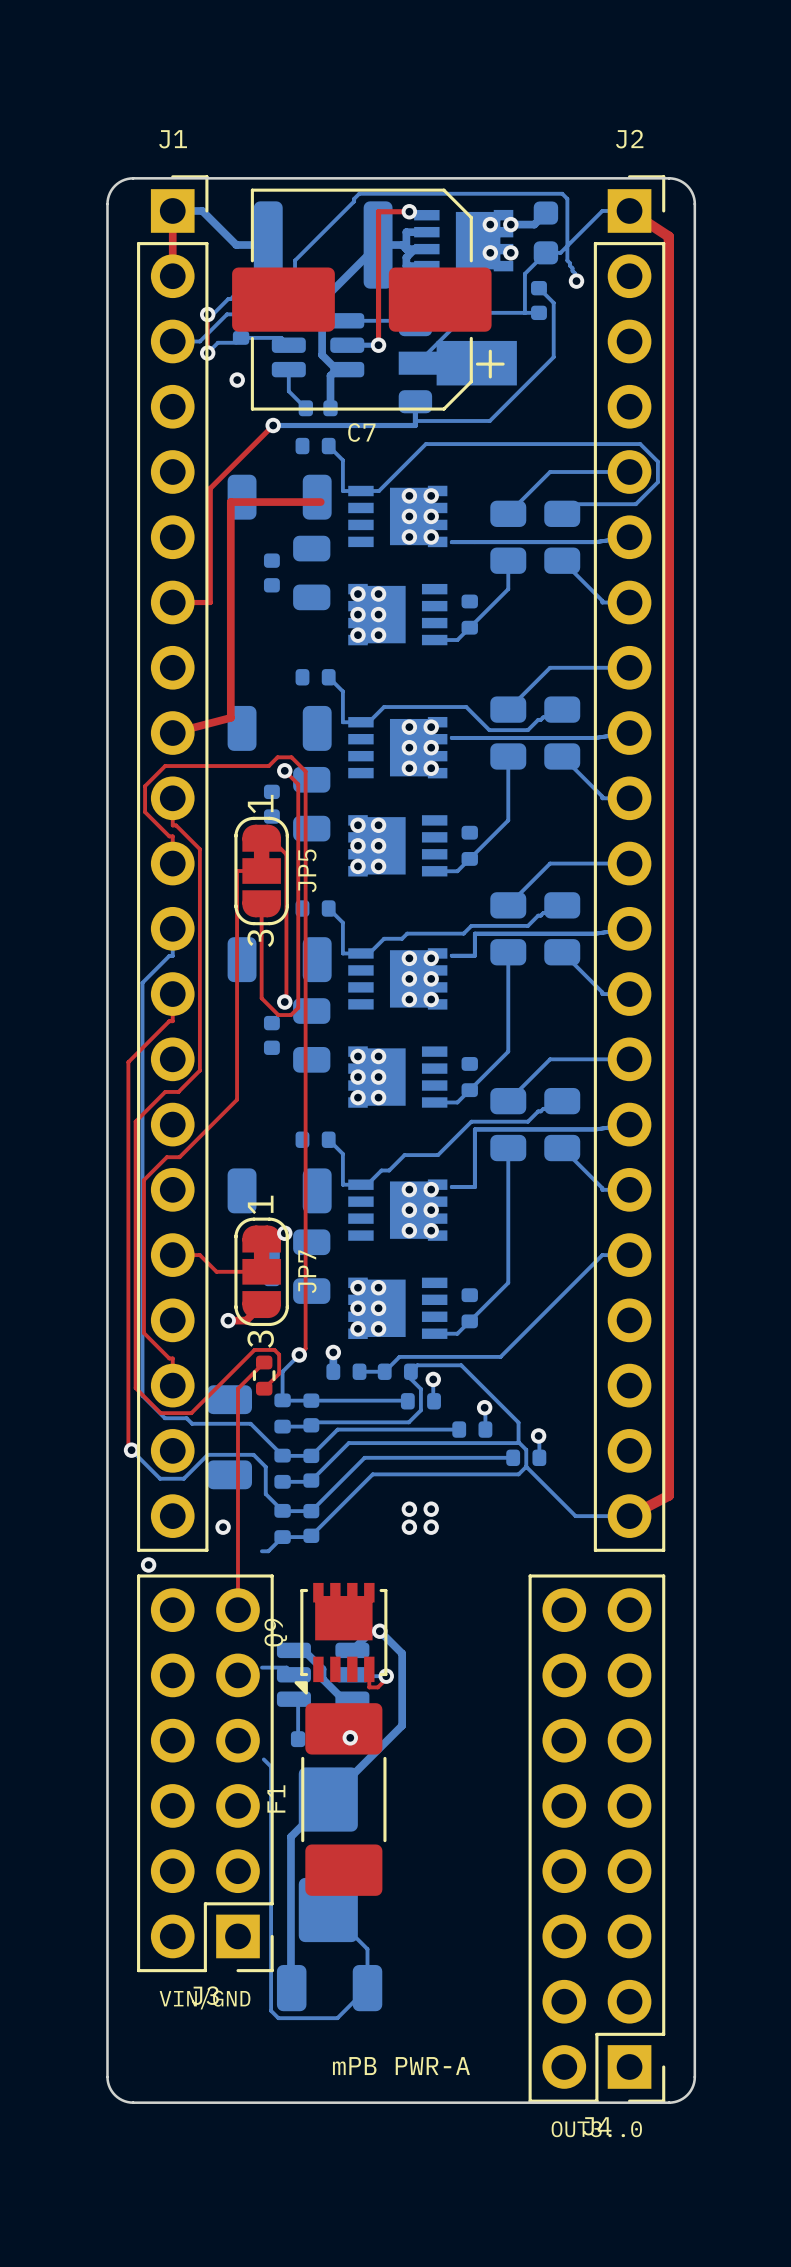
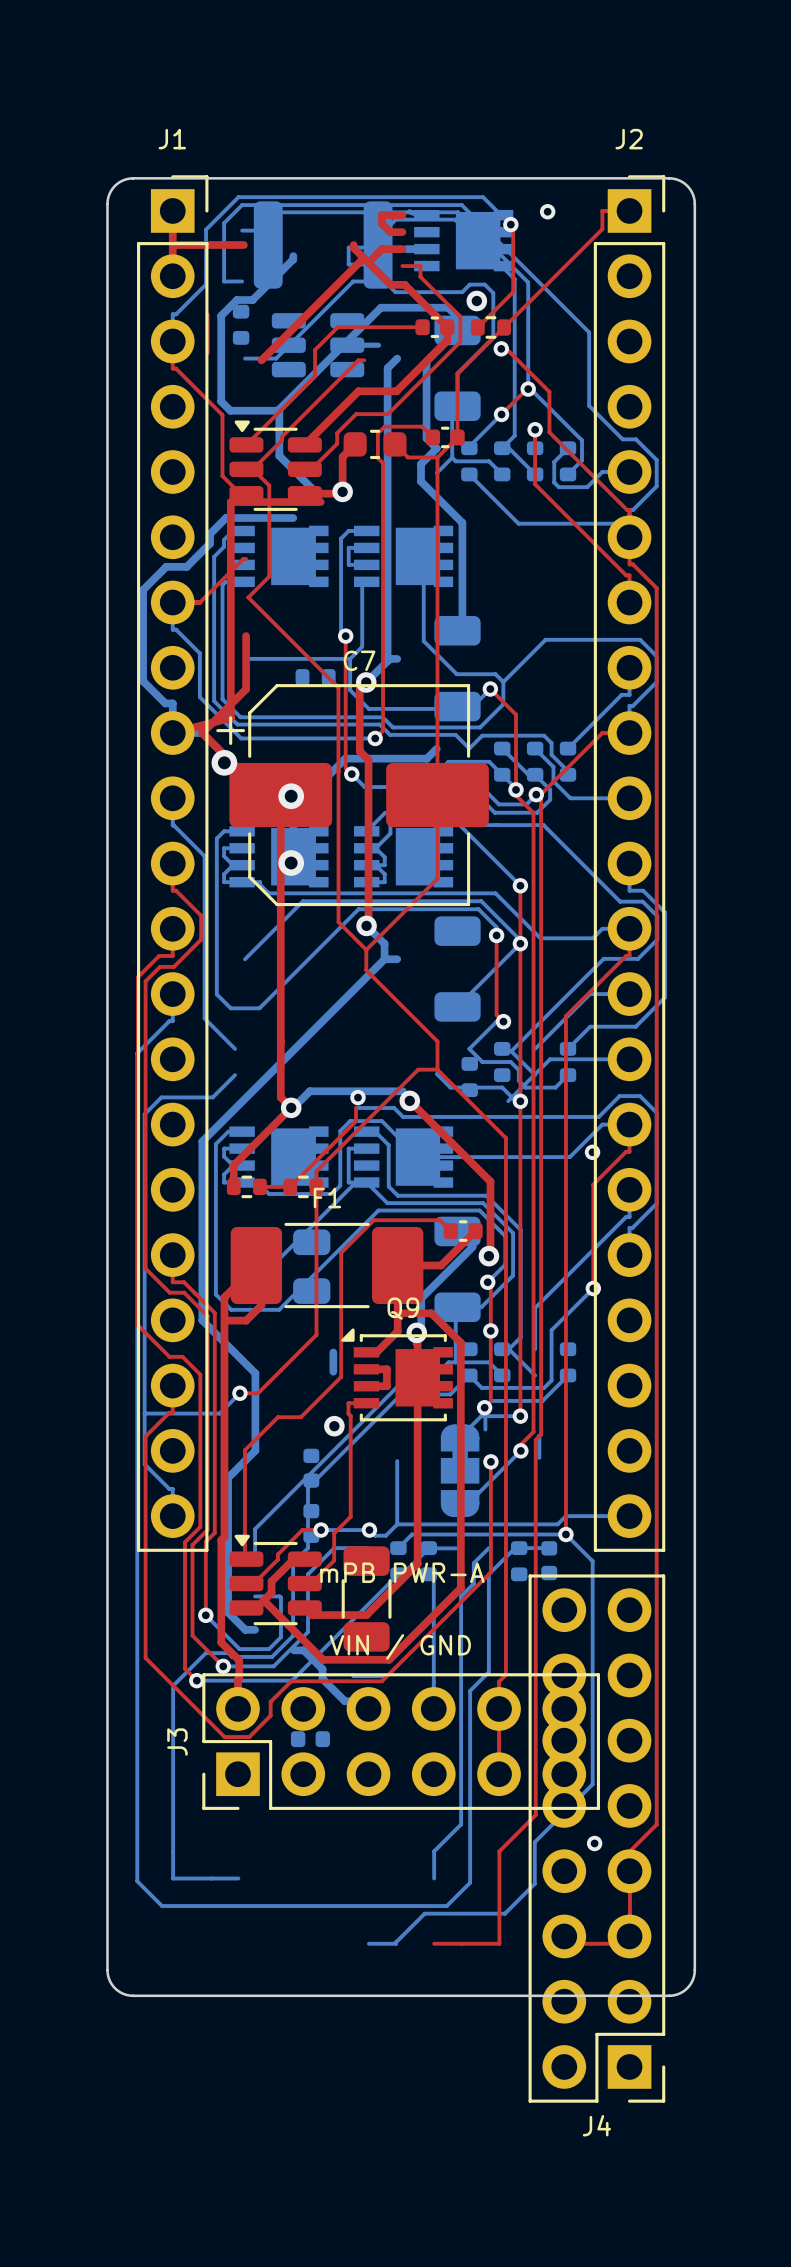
bottom track: (172, 210) (202, 210) (236, 245) (268, 245) -> none
top track: (629, 210) (668, 236) (668, 1495) (629, 1516) -> (629, 210) (602, 210) (602, 229) (457, 373) (457, 437) (437, 457)
bottom track: (629, 210) (602, 210) (560, 252) (545, 252) (524, 273) (524, 312) -> none
top track: (409, 211) (378, 211) (378, 345) -> none
via: (409, 211) -> none
via: none -> (547, 211)
bottom track: (545, 213) (534, 224) (510, 224) -> none
top track: none -> (402, 215) (381, 215) (381, 223) (390, 232) (402, 232)
via: (490, 224) -> none
top track: none -> (513, 227) (513, 292) (477, 327)
bottom track: none -> (242, 230) (260, 230) (260, 227) (275, 212) (458, 212) (528, 282) (528, 389) (530, 389) (582, 440) (582, 460) (568, 474)
bottom track: none -> (366, 230) (384, 230) (395, 219) (455, 219) (514, 279) (514, 435) (502, 448)
bottom track: (426, 232) (406, 232) (406, 249) (402, 245) (378, 245) (322, 300) (322, 355) (336, 369) -> none
part: (545, 232) -> none
top track: none -> (172, 245) (243, 245)
top track: none -> (353, 245) (353, 247) (390, 284) (404, 284) (447, 327) (447, 340) (396, 391) (358, 391) (304, 444)
bottom track: none -> (366, 247) (348, 247) (348, 264) (366, 264)
top track: none -> (402, 249) (381, 249) (368, 262)
bottom track: (414, 249) (406, 257) (406, 266) (426, 266) -> none
via: (490, 252) -> none
via: (510, 252) -> none
bottom track: none -> (293, 256) (293, 259) (252, 300) (236, 300) (221, 315) (221, 401) (230, 410) (279, 410)
top track: none -> (363, 258) (261, 360)
top track: none -> (402, 266) (420, 266) (420, 276) (460, 316) (460, 341) (388, 414) (356, 414) (337, 433) (337, 443) (311, 469) (304, 469)
via: (576, 281) -> none
bottom track: (577, 281) (567, 260) (567, 198) (562, 193) (359, 193) (354, 201) (295, 260) (295, 288) (287, 296) (233, 296) (212, 314) (207, 314) -> none
bottom track: (538, 288) (553, 302) (553, 357) (489, 420) (415, 420) -> none
C7 rotation: 0° (368, 299) -> 180° (352, 795)
C7 position: (368, 299) -> (352, 795)
part: (538, 300) -> none
via: none -> (476, 301)
bottom track: (538, 312) (468, 312) (417, 363) -> none
part footprint: [398, 313, 517, 414] -> [434, 315, 481, 422]
via: (207, 314) -> none
bottom track: (241, 314) (227, 314) (199, 341) (172, 341) -> (513, 227) (483, 197) (238, 197) (206, 229) (206, 284) (176, 314) (172, 314) (172, 341)
bottom track: (362, 320) (401, 320) -> none
top track: none -> (422, 327) (337, 327) (315, 349) (315, 376) (246, 444)
part: none -> (434, 327)
part: none -> (490, 327)
bottom track: (241, 337) (281, 337) (288, 345) -> none
top track: none -> (172, 341) (172, 368) (176, 368) (222, 415) (222, 476) (240, 493) (246, 493)
bottom track: (235, 342) (217, 342) (207, 353) -> none
via: (378, 345) -> none
top track: none -> (501, 348) (506, 348) (549, 391) (549, 432) (627, 510) (629, 510) (629, 564) (632, 564) (656, 588) (656, 1824) (629, 1851) (629, 1943) (564, 1943)
via: none -> (501, 348)
via: (207, 353) -> none
bottom track: none -> (245, 358) (276, 358) (353, 281) (384, 281) (395, 292) (462, 292) (469, 284) (484, 284) (493, 293) (493, 337) (457, 373) (457, 406) (452, 411) (452, 457)
bottom track: none -> (397, 358) (387, 368) (387, 661) (366, 682)
top track: none -> (364, 360) (358, 360) (282, 436) (282, 440) (252, 469)
bottom track: (288, 369) (288, 391) (305, 408) -> none
bottom track: (336, 369) (330, 375) (330, 408) -> none
via: (237, 380) -> none
top track: none -> (528, 389) (501, 414)
via: none -> (528, 389)
bottom track: (415, 401) (415, 425) (273, 425) -> none
part: (318, 408) -> none
bottom track: none -> (501, 414) (469, 448)
via: none -> (501, 414)
top track: (273, 425) (210, 488) (210, 602) (199, 602) -> (246, 558) (243, 558) (199, 602)
via: (273, 425) -> none
top track: none -> (535, 429) (535, 484) (626, 575) (629, 575) (629, 602)
via: none -> (535, 429)
top track: none -> (432, 437) (422, 426) (384, 426) (377, 433) (377, 458) (383, 463) (383, 730) (375, 738)
part: none -> (445, 437)
top track: none -> (355, 444) (342, 456) (342, 491) (340, 493) (304, 493)
part: none -> (375, 444)
top track: none -> (394, 444) (408, 457) (437, 457)
bottom track: none -> (505, 444) (535, 474)
part: (315, 446) -> none
bottom track: (328, 446) (342, 460) (342, 491) (378, 491) (425, 444) (640, 444) (657, 461) (657, 482) (635, 504) (571, 504) (562, 513) -> none
top track: none -> (437, 457) (437, 878) (366, 949)
bottom track: none -> (452, 457) (455, 461) (489, 461) (502, 474)
bottom track: none -> (452, 457) (436, 473)
part: none -> (469, 461)
part: none -> (502, 461)
part: none -> (535, 461)
part: none -> (568, 461)
part: none -> (275, 465)
top track: none -> (252, 469) (269, 485) (269, 576) (248, 597) (338, 687) (338, 922) (366, 949)
bottom track: (602, 472) (550, 472) (508, 513) -> (602, 472) (587, 487) (558, 487) (554, 482) (554, 462) (568, 448)
bottom track: none -> (469, 474) (518, 523) (629, 523)
bottom track: none -> (315, 491) (279, 455) (279, 409) (380, 307) (448, 307) (457, 317) (457, 330) (426, 361) (426, 438) (436, 448) (421, 464) (421, 481) (462, 522) (462, 625) (457, 630)
via: none -> (342, 491)
via: (409, 495) -> none
via: (431, 495) -> none
part: (279, 497) -> none
part: (397, 516) -> none
via: (409, 516) -> none
via: (431, 516) -> none
bottom track: none -> (293, 518) (226, 518) (210, 534) (210, 543) (186, 566) (166, 566) (143, 590) (143, 681) (165, 703) (172, 703) (172, 733) (202, 733) (280, 810) (293, 810)
bottom track: none -> (242, 530) (232, 530) (224, 539) (224, 546) (214, 556) (214, 701) (237, 724) (379, 724) (390, 734) (455, 734) (469, 748) (482, 735) (544, 735) (551, 743) (551, 754) (568, 771) (568, 774)
bottom track: none -> (366, 530) (348, 530) (341, 538) (341, 631) (345, 636)
via: (409, 537) -> none
via: (431, 537) -> none
part: (508, 537) -> none
part: (562, 537) -> none
bottom track: (629, 537) (595, 542) (451, 542) -> (629, 537) (629, 510) (632, 510) (656, 486) (656, 460) (636, 439) (622, 439) (589, 405) (589, 332) (461, 205) (242, 205) (224, 223) (224, 281) (242, 281)
bottom track: none -> (366, 547) (348, 547) (348, 564) (366, 564)
part footprint: [263, 553, 280, 593] -> [229, 525, 329, 588]
part: none -> (403, 556)
bottom track: none -> (417, 556) (423, 562) (423, 641) (456, 674) (495, 674) (503, 682)
bottom track: (508, 560) (508, 589) (457, 640) (434, 640) -> none
bottom track: (562, 560) (602, 602) (629, 602) -> none
part: (311, 572) -> none
bottom track: none -> (242, 581) (225, 581) (222, 585) (222, 699) (240, 717) (382, 717) (392, 727) (480, 727) (503, 704) (503, 682)
bottom track: none -> (362, 581) (362, 646) (350, 658)
via: (357, 594) -> none
via: (378, 594) -> none
bottom track: none -> (172, 602) (172, 629) (176, 629) (199, 653) (199, 697) (241, 738) (375, 738)
via: (357, 614) -> none
via: (378, 614) -> none
part: (397, 614) -> none
part: (469, 614) -> none
via position: (357, 635) -> (345, 636)
via: (378, 635) -> none
top track: none -> (246, 636) (246, 689) (202, 733) (264, 795) (280, 795) (280, 1097) (291, 1107) (233, 1165) (233, 1186)
top track: none -> (345, 636) (345, 768) (351, 774)
bottom track: none -> (245, 658) (350, 658)
bottom track: none -> (350, 658) (350, 690) (368, 708) (455, 708) (457, 706) (472, 706) (490, 689)
bottom track: none -> (387, 658) (397, 658)
bottom track: (629, 667) (550, 667) (508, 709) -> (629, 667) (629, 694) (621, 694) (568, 748)
part: none -> (457, 668)
bottom track: (328, 677) (342, 691) (342, 722) (360, 722) -> none
top track: none -> (366, 682) (359, 688) (359, 751) (368, 760) (368, 923) (366, 925)
via: none -> (366, 682)
top track: none -> (490, 689) (516, 714) (516, 795) (533, 812) (533, 1431) (520, 1444) (520, 1450)
via: none -> (490, 689)
bottom track: (545, 717) (538, 719) (527, 730) (489, 730) (466, 707) (384, 707) (371, 719) -> none
via: (409, 727) -> none
via: (431, 727) -> none
part: (279, 728) -> none
part: (508, 733) -> none
part: (562, 733) -> none
top track: none -> (629, 733) (602, 733) (541, 794) (541, 1434) (535, 1439) (535, 1815) (499, 1851) (499, 1943) (434, 1943)
bottom track: (629, 733) (595, 737) (451, 737) -> (629, 733) (629, 705) (632, 705) (656, 682) (656, 656) (640, 639) (545, 639) (503, 682)
via: none -> (375, 738)
part: (397, 747) -> none
via: (409, 747) -> none
via: (431, 747) -> none
bottom track: none -> (436, 748) (426, 758) (345, 758) (293, 810)
bottom track: none -> (502, 748) (528, 774) (535, 774) (550, 789) (550, 799) (537, 812) (494, 812) (469, 787) (364, 787) (351, 774)
bottom track: (508, 756) (508, 820) (457, 871) (434, 871) -> none
bottom track: (562, 756) (602, 798) -> (535, 748) (553, 766) (553, 781) (570, 798) (602, 798)
part: none -> (502, 761)
part: none -> (535, 761)
part: none -> (568, 761)
via: none -> (224, 762)
via: (409, 768) -> none
via: (431, 768) -> none
top track: (284, 770) (298, 784) (298, 1007) (291, 1015) (278, 1015) (261, 998) (261, 904) -> none
via: (284, 770) -> none
bottom track: none -> (436, 773) (448, 761) (489, 761) (516, 789)
via: none -> (351, 774)
bottom track: none -> (469, 774) (498, 804) (526, 804) (536, 794)
via: none -> (516, 789)
via: none -> (536, 794)
via: none -> (291, 796)
top track: (172, 798) (172, 825) (176, 825) (199, 849) (199, 1070) (178, 1091) (165, 1091) (135, 1121) (135, 1388) (160, 1413) (191, 1413) (254, 1349) (274, 1349) (279, 1354) (279, 1373) (264, 1388) -> none
bottom track: none -> (172, 798) (172, 825) (204, 856) (204, 1018) (235, 1048)
part: (271, 804) -> none
part: (311, 804) -> none
via: (357, 825) -> none
via: (378, 825) -> none
bottom track: none -> (242, 831) (224, 831) (216, 838) (216, 994) (230, 1008) (259, 1008) (358, 909) (478, 909) (496, 927) (496, 935)
bottom track: none -> (366, 831) (384, 813) (461, 813) (473, 825) (543, 825) (620, 901) (642, 901) (657, 916) (657, 939) (638, 958) (603, 958) (511, 1051) (535, 1075)
top track: (261, 837) (269, 837) (286, 854) (286, 1000) (284, 1002) -> none
via: (357, 845) -> none
via: (378, 845) -> none
part rotation: 0° (397, 845) -> 180° (403, 856)
part: (469, 845) -> none
bottom track: none -> (242, 848) (224, 848) (224, 856) (233, 865)
bottom track: none -> (375, 848) (384, 857) (384, 865) (366, 865)
bottom track: none -> (375, 848) (390, 833) (390, 825) (395, 820) (455, 820) (520, 885)
part: none -> (278, 856)
top track: (172, 863) (172, 836) (169, 836) (145, 812) (145, 786) (165, 766) (268, 766) (277, 757) (291, 757) (305, 771) (305, 1348) (299, 1354) -> (172, 863) (172, 890) (176, 890) (201, 915) (201, 939) (173, 966) (159, 966) (145, 981) (145, 1268) (169, 1292) (184, 1292) (207, 1316) (207, 1529) (192, 1544) (192, 1635) (223, 1666)
via: none -> (291, 863)
bottom track: (629, 863) (550, 863) (508, 905) -> (629, 863) (629, 890) (643, 890) (665, 912) (665, 997) (635, 1026) (590, 1026) (568, 1048)
bottom track: none -> (375, 865) (384, 874) (384, 882) (366, 882)
via: (357, 866) -> none
via: (378, 866) -> none
top track: (261, 871) (237, 871) (237, 1099) (179, 1157) (166, 1157) (143, 1180) (143, 1333) (169, 1358) (172, 1358) (172, 1385) -> (490, 1461) (490, 1572) (381, 1681) (291, 1681) (270, 1701) (270, 1715) (249, 1737) (224, 1737) (145, 1658) (145, 1436) (169, 1412) (172, 1412) (172, 1385)
JP5: (261, 871) -> none
top track: none -> (520, 885) (520, 1416)
via: none -> (520, 885)
part: (315, 908) -> none
bottom track: (328, 908) (342, 922) (342, 953) (360, 953) -> none
bottom track: (545, 913) (538, 915) (527, 925) (471, 925) (463, 933) (407, 933) (402, 938) (384, 938) (371, 951) -> none
bottom track: none -> (366, 925) (384, 943) (384, 959)
via: none -> (366, 925)
top track: none -> (172, 928) (172, 955) (159, 955) (137, 977) (137, 1325) (169, 1356) (182, 1356) (200, 1374) (200, 1526) (185, 1542) (185, 1668) (196, 1680)
bottom track: (172, 928) (172, 955) (169, 955) (142, 982) (142, 1395) (164, 1418) (186, 1418) (192, 1423) (250, 1423) (282, 1455) (311, 1455) (337, 1429) (459, 1429) -> none
part: (508, 928) -> none
part: (562, 928) -> none
top track: none -> (629, 928) (629, 955) (626, 955) (565, 1016) (565, 1534)
bottom track: (629, 928) (595, 933) (474, 933) (474, 955) (451, 955) -> (629, 928) (602, 928) (592, 938) (540, 938) (495, 893) (268, 893) (260, 884) (260, 882) (224, 882) (224, 874) (233, 865)
top track: none -> (496, 935) (496, 1014) (503, 1021)
via: none -> (496, 935)
via: none -> (520, 943)
top track: none -> (366, 949) (366, 970) (437, 1041) (437, 1069)
bottom track: (508, 952) (508, 1051) (457, 1102) (434, 1102) -> none
bottom track: (562, 952) (602, 994) -> (535, 1048) (589, 994) (602, 994)
via: (409, 958) -> none
via: (431, 958) -> none
bottom track: none -> (245, 959) (303, 901) (481, 901) (520, 940) (520, 943) (457, 1006)
part: (279, 959) -> none
bottom track: none -> (384, 959) (397, 959)
bottom track: none -> (384, 959) (202, 1141) (202, 1320) (255, 1373) (255, 1450) (228, 1477) (228, 1612) (245, 1629) (255, 1629)
part: none -> (457, 969)
part: (397, 978) -> none
via: (409, 978) -> none
via: (431, 978) -> none
top track: (172, 994) (172, 1021) (169, 1021) (128, 1062) (128, 1447) (131, 1450) -> none
bottom track: none -> (172, 994) (172, 1021) (169, 1021) (137, 1053) (137, 1881) (162, 1906) (446, 1906) (470, 1882) (470, 1690) (488, 1672) (488, 1574) (515, 1548) (549, 1548)
via: (409, 999) -> none
via: (431, 999) -> none
via: (284, 1002) -> none
bottom track: none -> (503, 1021) (496, 1021) (469, 1048) (482, 1062) (510, 1062) (518, 1070) (518, 1080) (525, 1087) (555, 1087) (568, 1075)
via: none -> (503, 1021)
part: (271, 1035) -> none
part: (311, 1035) -> none
via: (357, 1056) -> none
via: (378, 1056) -> none
part: none -> (502, 1062)
part: none -> (568, 1062)
top track: none -> (437, 1069) (418, 1069) (316, 1171) (316, 1334) (258, 1393) (239, 1393)
top track: none -> (437, 1069) (505, 1138) (505, 1674) (499, 1681) (499, 1774)
bottom track: none -> (436, 1073) (450, 1087) (502, 1087) (515, 1101) (520, 1101)
bottom track: none -> (235, 1075) (212, 1097) (161, 1097) (144, 1114) (144, 1464) (169, 1488) (172, 1488) (172, 1516)
via: (357, 1077) -> none
via: (378, 1077) -> none
part: (397, 1077) -> none
bottom track: none -> (402, 1091) (309, 1091) (291, 1107)
via: (378, 1097) -> none
top track: none -> (409, 1100) (490, 1181) (490, 1254) (488, 1256)
via: none -> (409, 1100)
via: none -> (520, 1101)
via: none -> (291, 1107)
top track: none -> (356, 1107) (356, 1121) (290, 1186) (259, 1186)
bottom track: (545, 1108) (538, 1111) (527, 1121) (471, 1121) (438, 1155) (404, 1155) (389, 1170) (381, 1170) (371, 1180) -> none
part: (508, 1124) -> none
part: (562, 1124) -> none
top track: none -> (629, 1124) (629, 1151) (626, 1151) (593, 1184) (593, 1288)
bottom track: (629, 1124) (595, 1129) (474, 1129) (474, 1187) (451, 1187) -> (629, 1124) (602, 1124) (569, 1157) (417, 1157) (381, 1121) (350, 1121) (340, 1131) (340, 1185) (331, 1193) (268, 1193) (260, 1185) (260, 1182) (224, 1182) (224, 1174) (233, 1165)
bottom track: none -> (242, 1131) (228, 1131) (215, 1144) (215, 1294) (231, 1309) (279, 1309) (378, 1210) (479, 1210) (505, 1236) (505, 1264) (487, 1282)
bottom track: none -> (366, 1131) (375, 1131) (388, 1145) (388, 1186) (397, 1195) (486, 1195) (520, 1230) (520, 1337) (508, 1349) (535, 1375)
part: (315, 1139) -> none
bottom track: (328, 1139) (342, 1153) (342, 1184) (360, 1184) -> none
bottom track: none -> (242, 1148) (224, 1148) (224, 1156) (233, 1165)
bottom track: none -> (366, 1148) (348, 1148) (348, 1182) (366, 1182) (387, 1203) (483, 1203) (513, 1233) (513, 1275) (481, 1307) (457, 1307) (455, 1309) (455, 1362)
bottom track: (508, 1148) (508, 1282) (457, 1333) (434, 1333) -> none
bottom track: (562, 1148) (602, 1189) (629, 1189) -> (535, 1349) (535, 1308) (626, 1216) (629, 1216) (629, 1189)
via: none -> (592, 1152)
part: none -> (278, 1157)
part: none -> (403, 1157)
bottom track: none -> (355, 1182) (278, 1259) (245, 1259)
part: none -> (246, 1186)
part: none -> (303, 1186)
via: (409, 1189) -> none
via: (431, 1189) -> none
part: (279, 1190) -> none
part: (397, 1210) -> none
via: (409, 1210) -> none
via: (431, 1210) -> none
via: (409, 1230) -> none
via: (431, 1230) -> none
top track: none -> (450, 1231) (440, 1220) (373, 1220) (341, 1252) (341, 1376) (300, 1417) (277, 1417) (244, 1450) (246, 1559)
part: none -> (463, 1231)
top track: none -> (475, 1231) (441, 1265) (397, 1265) (397, 1331) (376, 1352) (366, 1352)
via: (284, 1233) -> none
bottom track: none -> (472, 1246) (421, 1298) (421, 1328) (416, 1332) (416, 1343)
top track: (172, 1255) (199, 1255) (216, 1271) (261, 1271) -> (172, 1255) (172, 1282) (184, 1282) (214, 1313) (214, 1532) (205, 1541) (205, 1615)
bottom track: (629, 1255) (602, 1255) (500, 1356) (399, 1356) (384, 1371) (359, 1371) -> (629, 1255) (629, 1227) (632, 1227) (656, 1203) (656, 1112) (640, 1096) (619, 1096) (598, 1116) (403, 1116) (394, 1107) (356, 1107)
via: none -> (488, 1256)
top track: none -> (256, 1265) (224, 1297) (224, 1537) (221, 1540) (221, 1642) (239, 1660) (238, 1708)
part: none -> (457, 1269)
JP7: (261, 1271) -> none
top track: none -> (487, 1282) (490, 1285) (490, 1400)
via: none -> (487, 1282)
via: (357, 1287) -> none
via: (378, 1287) -> none
bottom track: none -> (593, 1288) (551, 1330) (551, 1380) (544, 1387) (481, 1387) (469, 1375) (450, 1394) (401, 1394) (308, 1487) (308, 1548) (293, 1563) (293, 1635) (272, 1656) (232, 1656) (228, 1653) (205, 1653) (173, 1685) (173, 1878) (238, 1878)
via: none -> (593, 1288)
via: (357, 1308) -> none
via: (378, 1308) -> none
part: (397, 1308) -> none
part: (469, 1308) -> none
top track: none -> (397, 1313) (431, 1313) (460, 1342) (460, 1588) (389, 1659) (323, 1659) (263, 1600)
via: (228, 1320) -> none
via: (357, 1328) -> none
via: (378, 1328) -> none
via: none -> (490, 1330)
top track: none -> (416, 1332) (417, 1563) (366, 1615) (311, 1615) (304, 1607)
via: none -> (416, 1332)
via: (333, 1352) -> none
bottom track: (299, 1354) (282, 1371) (282, 1400) -> none
via: (299, 1354) -> none
top track: (264, 1362) (238, 1388) (238, 1610) -> none
part: none -> (469, 1362)
part: none -> (502, 1362)
part: none -> (568, 1362)
top track: none -> (366, 1369) (386, 1369) (386, 1386) (366, 1386)
part: (346, 1371) -> none
part: (397, 1371) -> none
part: (264, 1375) -> none
bottom track: none -> (502, 1375) (489, 1362) (448, 1362) (436, 1374) (410, 1374) (255, 1529) (255, 1563)
bottom track: none -> (568, 1375) (542, 1400) (490, 1400)
via: (433, 1379) -> none
bottom track: none -> (239, 1393) (219, 1413) (144, 1413)
via: none -> (239, 1393)
bottom track: (282, 1400) (407, 1401) -> none
part: (420, 1401) -> none
top track: none -> (366, 1403) (348, 1403) (348, 1413) (350, 1415) (350, 1516) (334, 1533) (334, 1560) (311, 1583) (304, 1583)
part position: (311, 1412) -> (549, 1560)
part: (282, 1413) -> none
bottom track: none -> (520, 1416) (481, 1416) (460, 1437)
via: none -> (520, 1416)
bottom track: (282, 1426) (310, 1426) (314, 1422) (408, 1422) (420, 1410) (420, 1389) (410, 1379) (410, 1371) (417, 1365) (461, 1365) (518, 1422) (518, 1442) -> none
via: none -> (334, 1426)
part: (472, 1429) -> none
via: (538, 1435) -> none
part: (229, 1437) -> none
bottom track: (518, 1442) (348, 1443) (310, 1481) (282, 1481) -> none
bottom track: (518, 1442) (526, 1449) (526, 1466) -> none
bottom track: (131, 1450) (160, 1478) (183, 1478) (207, 1454) (253, 1454) (265, 1466) (265, 1494) (282, 1511) (311, 1511) (364, 1457) (513, 1457) -> none
via: (131, 1450) -> none
bottom track: none -> (520, 1450) (467, 1504) (460, 1504)
via: none -> (520, 1450)
part: (526, 1457) -> none
bottom track: none -> (397, 1461) (397, 1524)
via: none -> (490, 1461)
bottom track: (526, 1466) (575, 1516) -> (397, 1524) (557, 1524) (565, 1516) (575, 1516)
bottom track: (526, 1466) (518, 1474) (372, 1474) (310, 1537) (282, 1537) (268, 1551) (261, 1551) -> none
part: (282, 1468) -> none
part: none -> (460, 1470)
via: (409, 1509) -> none
via: (431, 1509) -> none
part: (282, 1523) -> none
bottom track: none -> (397, 1524) (385, 1535) (375, 1535) (369, 1530) (321, 1530)
via: (223, 1527) -> none
via: (409, 1527) -> none
via: (431, 1527) -> none
top track: none -> (321, 1530) (302, 1530) (277, 1554) (277, 1559) (253, 1583) (246, 1583)
via: none -> (321, 1530)
via: none -> (369, 1530)
via: none -> (565, 1534)
bottom track: none -> (368, 1548) (334, 1548) (308, 1574) (308, 1632) (273, 1666) (223, 1666)
bottom track: none -> (398, 1548) (412, 1534) (565, 1534) (592, 1561) (592, 1784) (534, 1842) (534, 1883) (504, 1913) (424, 1913) (396, 1943) (368, 1943)
bottom track: none -> (458, 1548) (428, 1548) (402, 1574) (398, 1574) (292, 1680) (196, 1680)
bottom track: none -> (488, 1548) (473, 1563) (473, 1583) (461, 1596) (461, 1824) (434, 1851) (434, 1878)
top track: none -> (304, 1559) (293, 1559) (271, 1581) (271, 1592) (256, 1607) (246, 1607)
part: none -> (398, 1561)
part: none -> (428, 1561)
part: none -> (519, 1561)
via: (148, 1564) -> none
bottom track: none -> (433, 1574) (433, 1708)
part: none -> (275, 1579)
bottom track: none -> (255, 1596) (280, 1597) (280, 1637) (269, 1649) (239, 1649) (205, 1615)
part: none -> (366, 1598)
via: none -> (205, 1615)
via: (379, 1631) -> none
Q9 rotation: 0° (340, 1638) -> 90° clockwise (397, 1374)
Q9 position: (340, 1638) -> (397, 1374)
text: none -> VIN / GND (400, 1646)
bottom track: (352, 1650) (371, 1631) (379, 1631) (402, 1653) (402, 1725) (290, 1836) (291, 1988) -> none
via: none -> (223, 1666)
bottom track: (262, 1667) (286, 1667) (293, 1674) -> none
top track: (369, 1669) (369, 1687) (377, 1687) (386, 1679) (386, 1676) -> none
part: (323, 1674) -> none
via: (386, 1676) -> none
via: none -> (196, 1680)
bottom track: (293, 1699) (298, 1703) (298, 1739) -> none
via: (350, 1737) -> none
bottom track: (263, 1759) (271, 1766) (271, 2010) (278, 2018) (337, 2018) (367, 1988) (367, 1949) (328, 1909) -> none
J3 rotation: 0° (205, 1773) -> 90° clockwise (401, 1741)
F1 rotation: 0° (343, 1799) -> 90° clockwise (327, 1265)
F1 position: (343, 1799) -> (327, 1265)
via: none -> (594, 1843)
part: (328, 1854) -> none
board edge: (107, 1970) (108, 2082) (117, 2097) (133, 2102) (674, 2102) (687, 2095) (694, 2079) (694, 1970) -> (107, 1970) (110, 1981) (115, 1988) (124, 1994) (133, 1995) (669, 1995) (680, 1993) (687, 1988) (692, 1981) (694, 1970)
part: (329, 1988) -> none
text: VIN/GND (205, 1999) -> none
text position: mPB PWR-A (401, 2066) -> mPB PWR-A (402, 1572)
text: OUT3..0 (596, 2129) -> none

